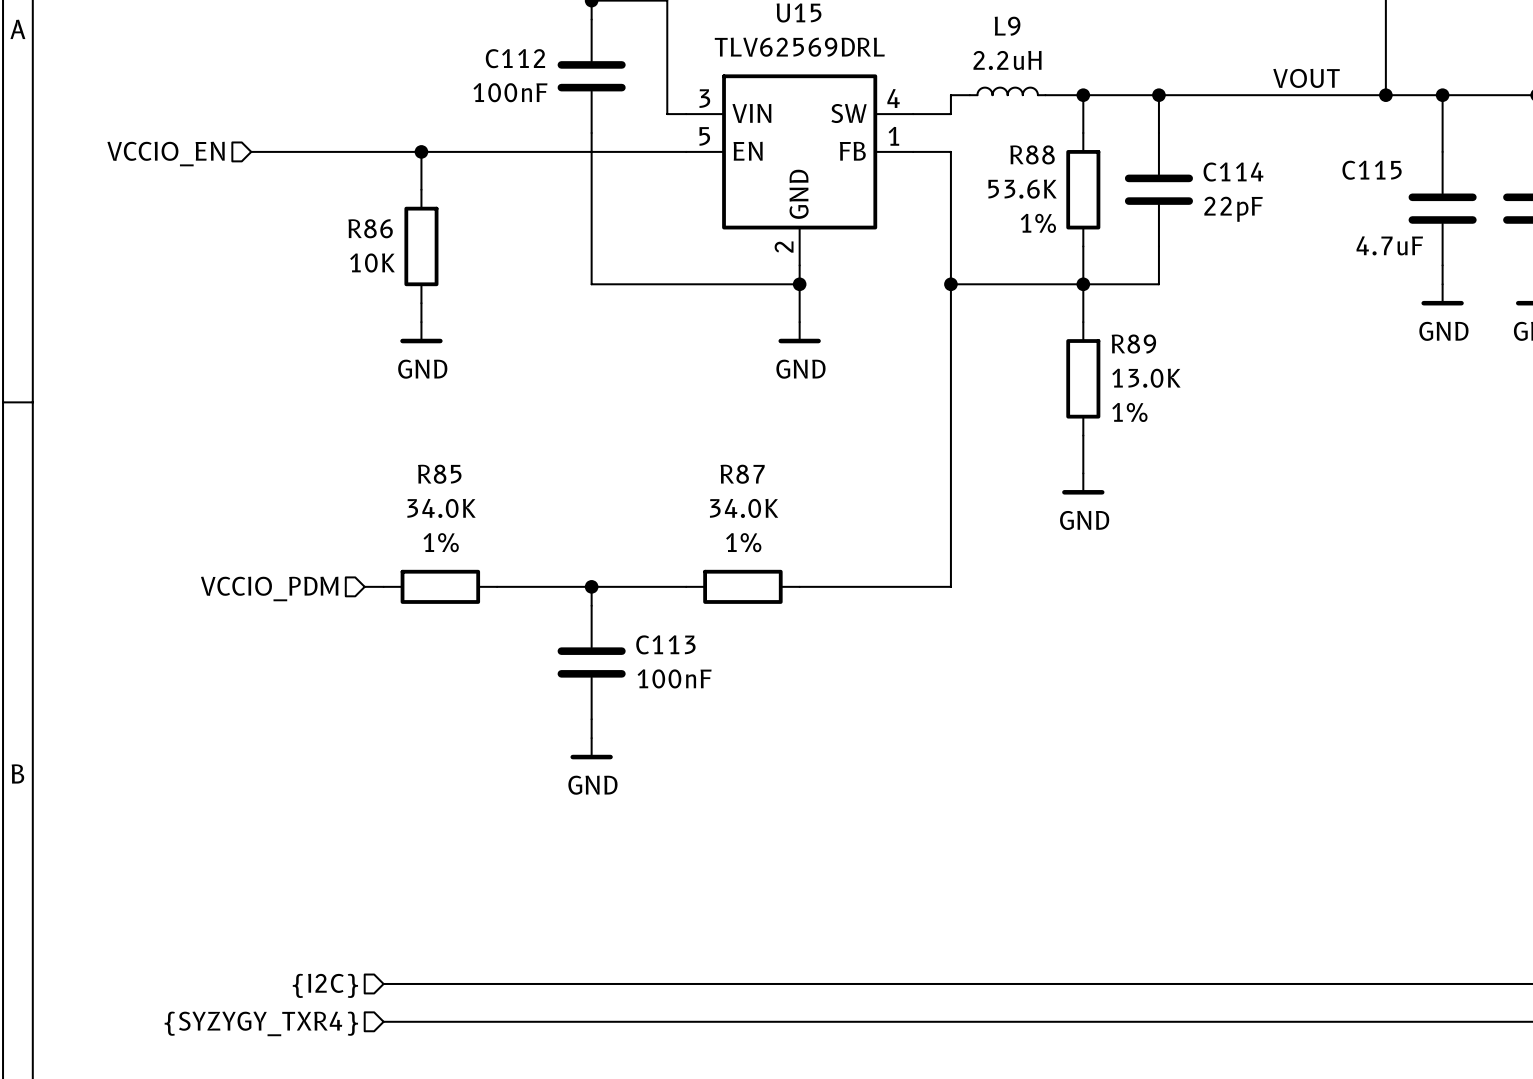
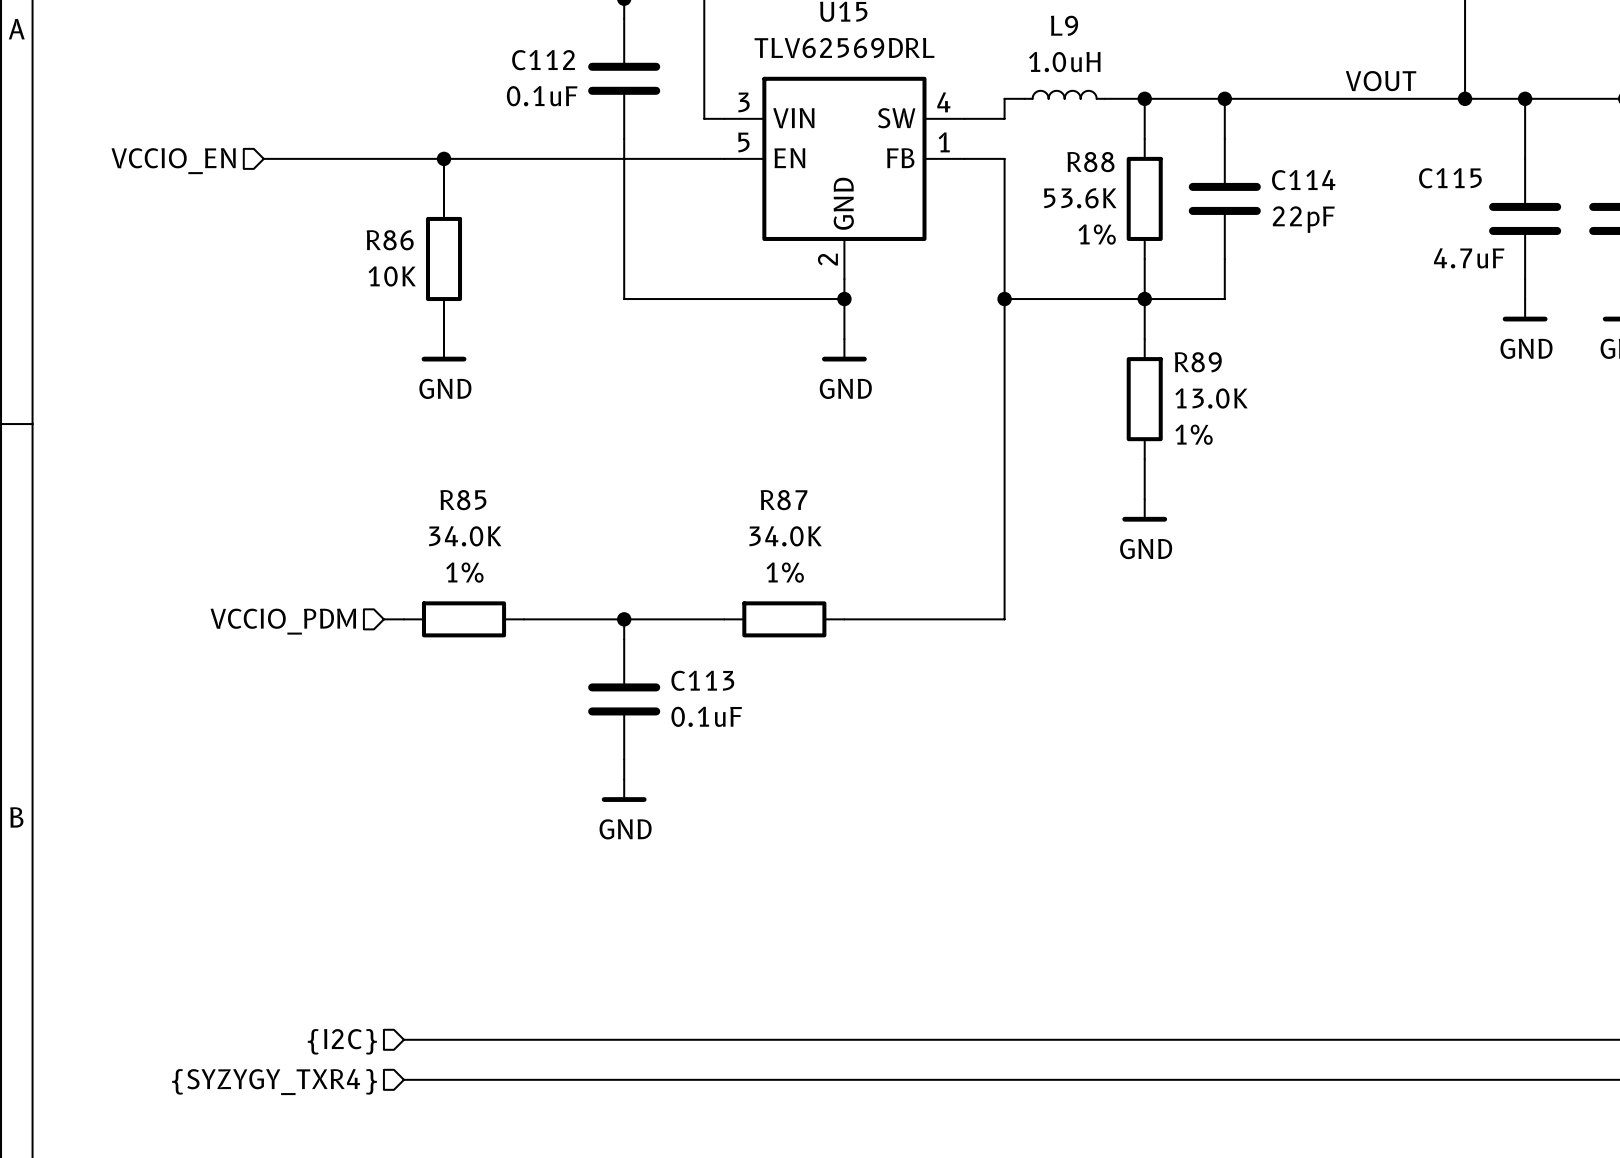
L9 value: 2.2uH (1007, 60) -> 1.0uH (1064, 62)
C112 value: 100nF (510, 92) -> 0.1uF (542, 96)
C113 value: 100nF (674, 678) -> 0.1uF (706, 716)

